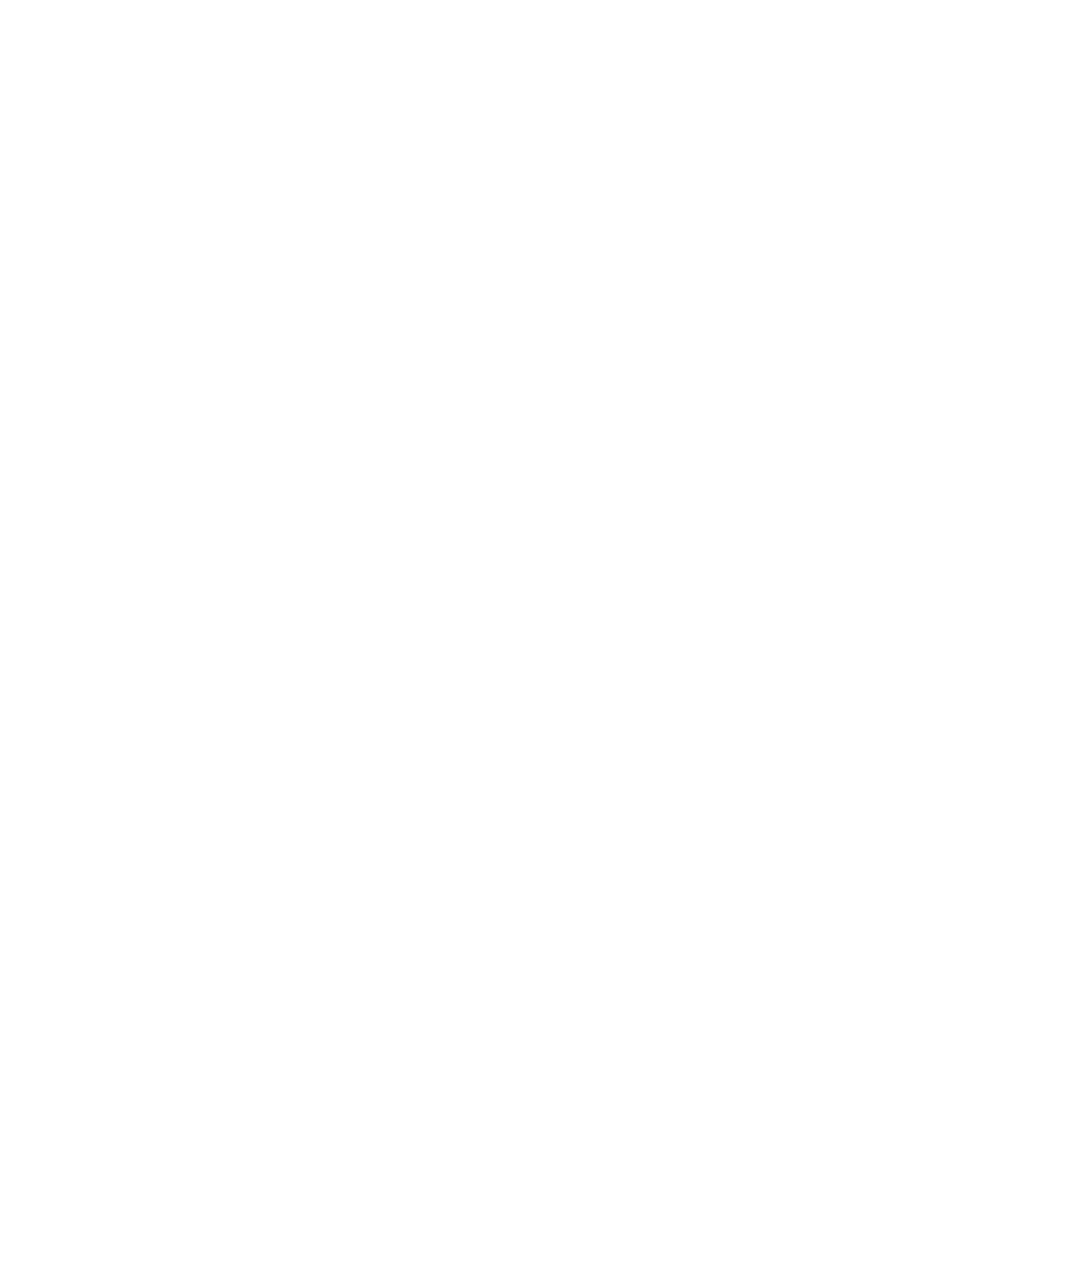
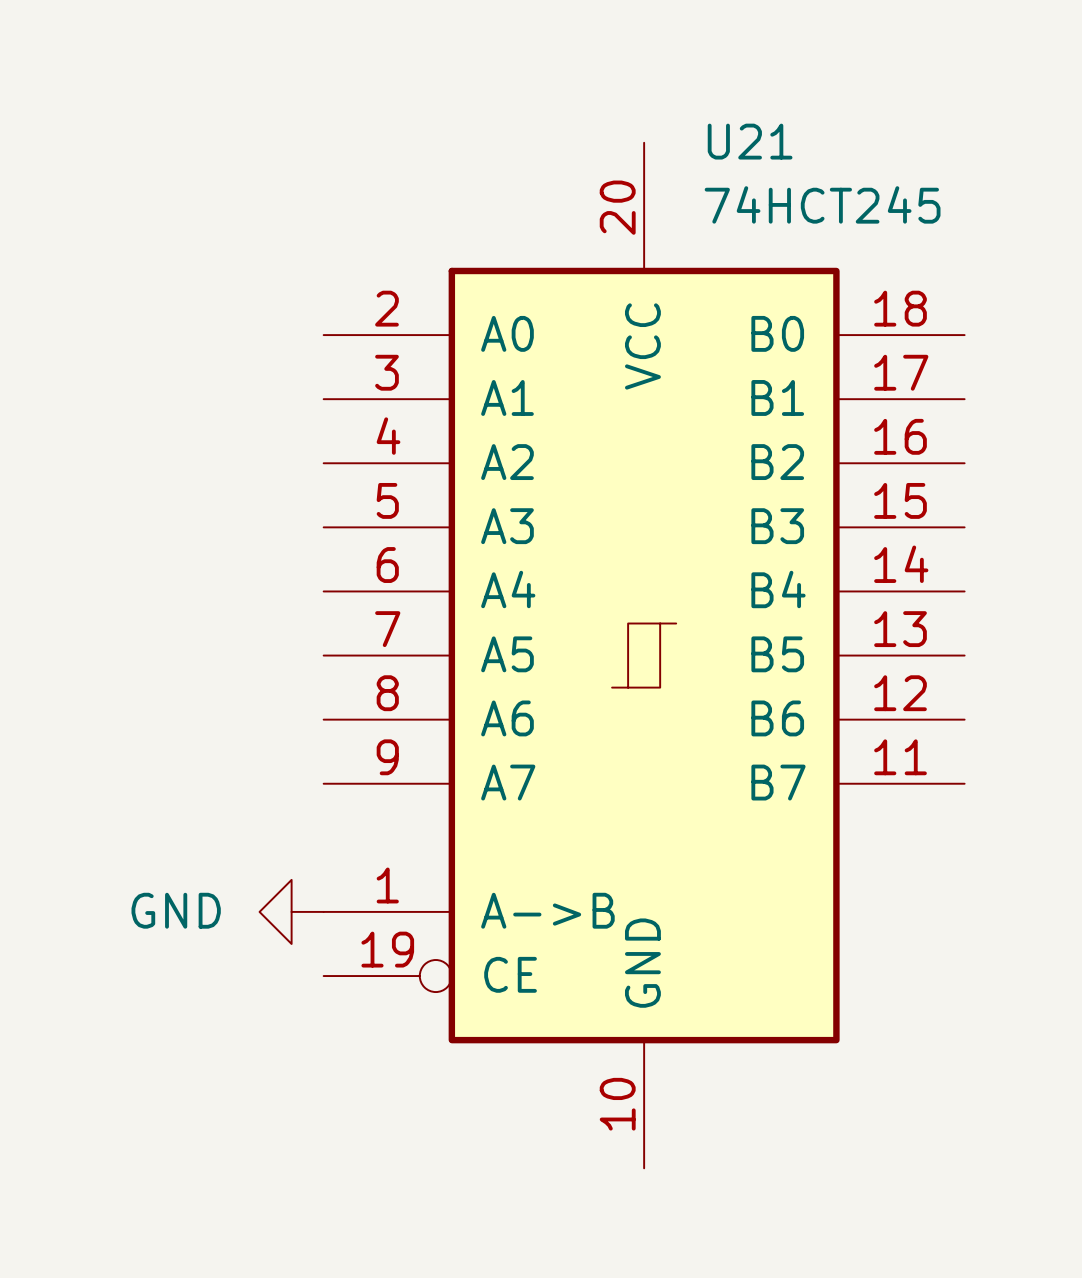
U21: none -> 74HCT245 (644, 655)
power symbol: none -> GND (291, 911)

